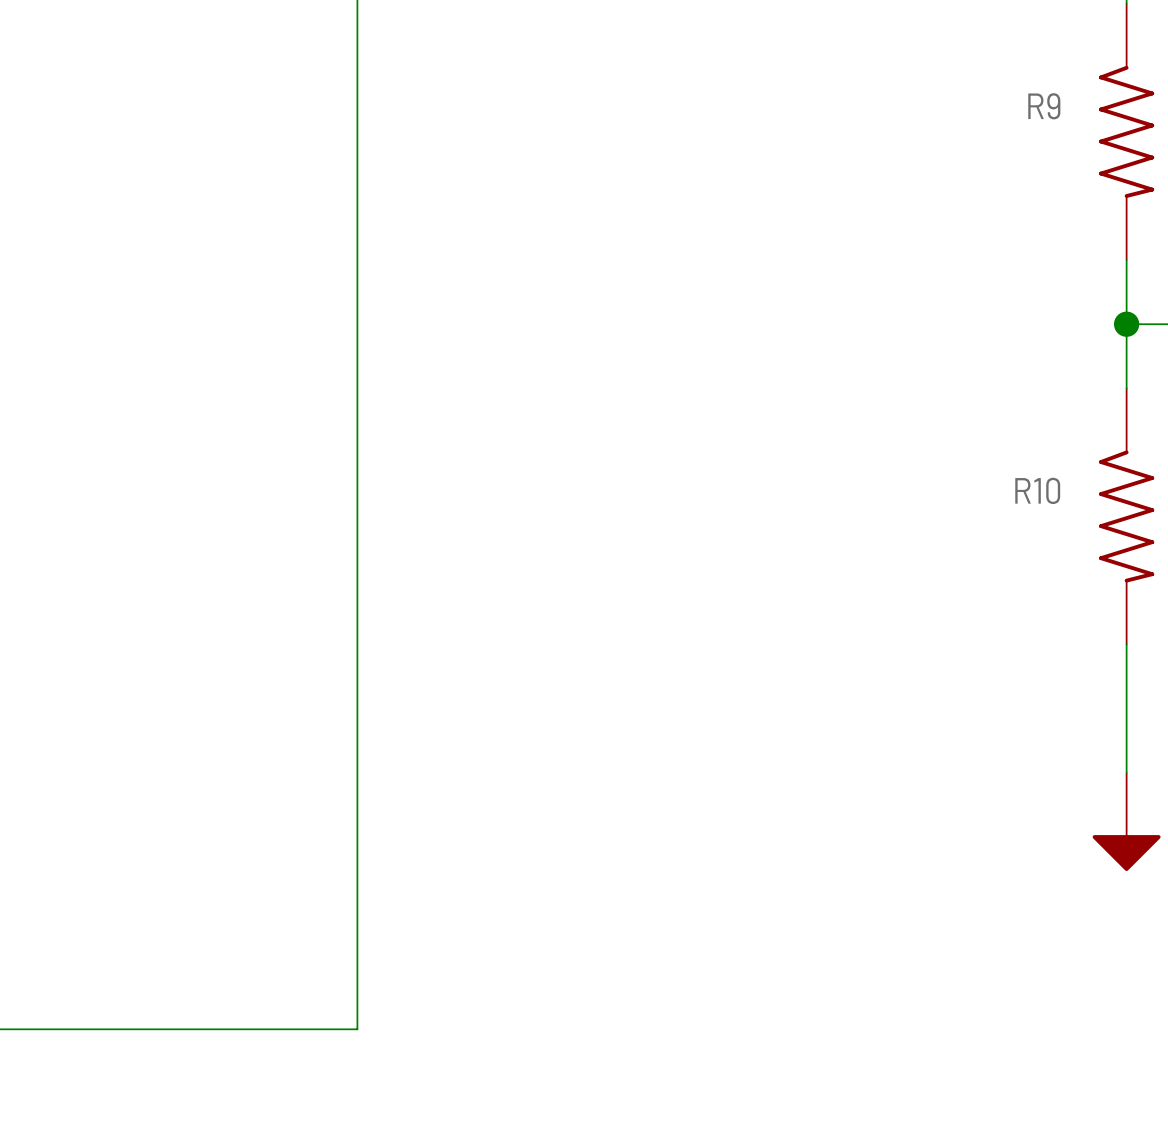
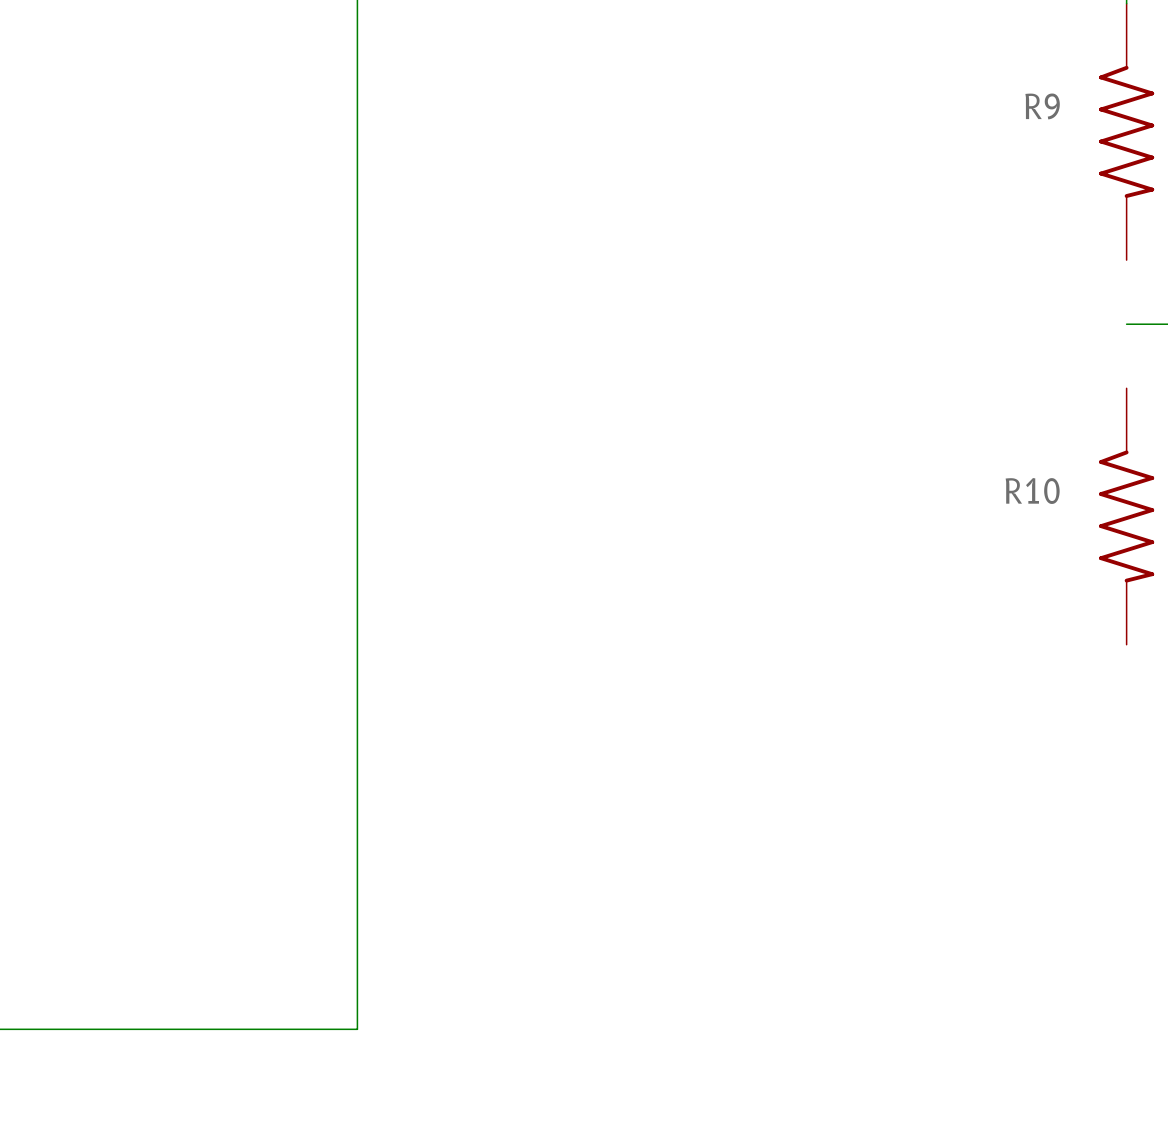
wire: (1126, 260) (1126, 388) -> none
junction: (1126, 324) -> none
wire: (1126, 644) (1126, 772) -> none
power symbol: (1126, 821) -> none

